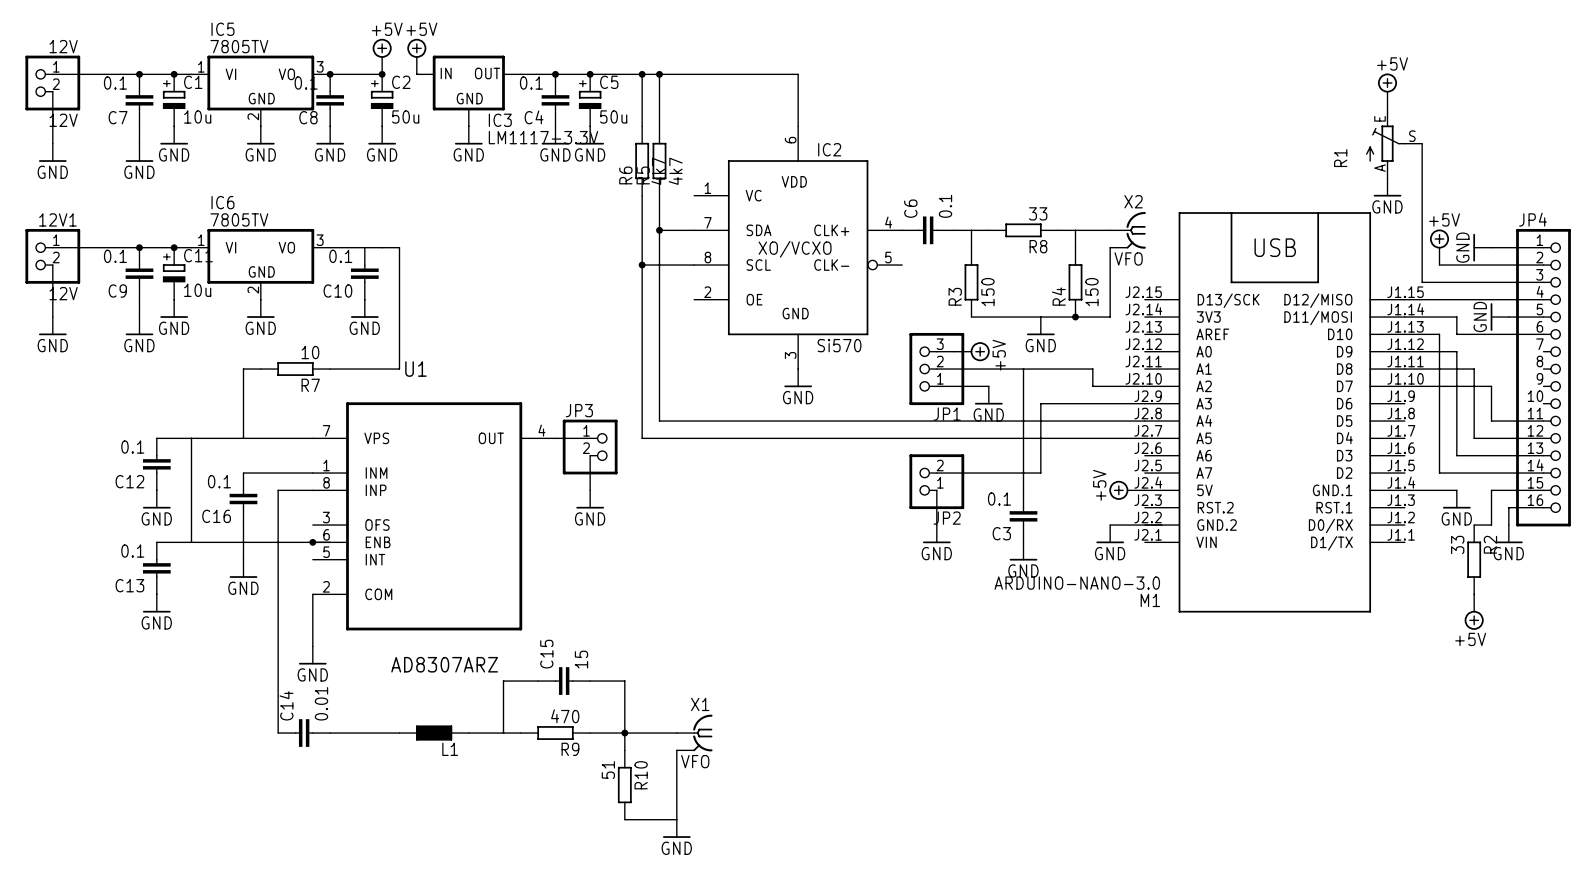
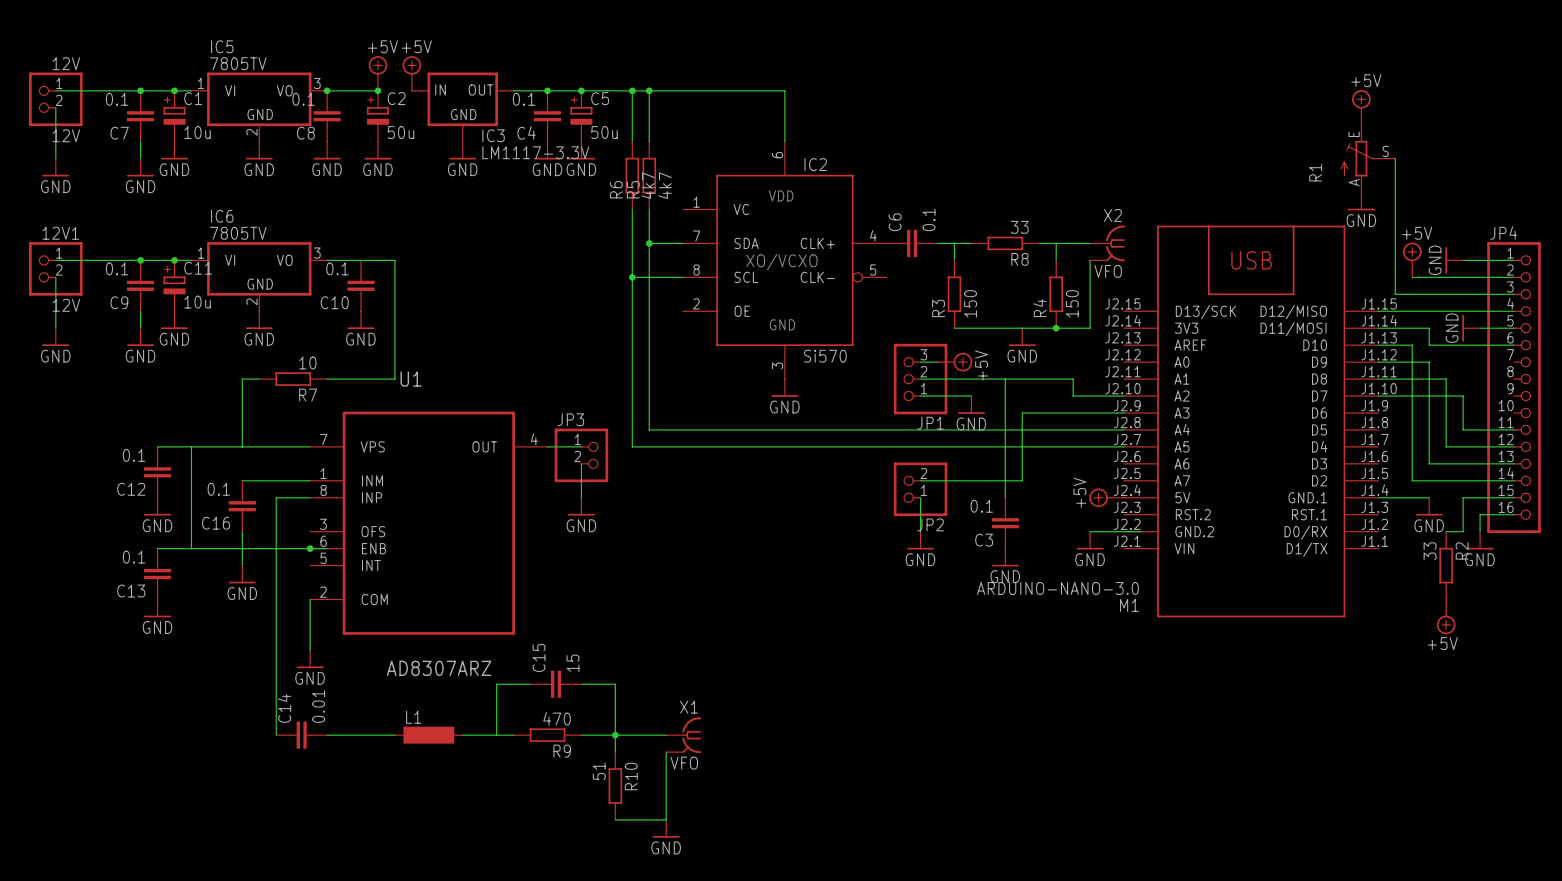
L1 symbol: [399, 725, 469, 741] -> [394, 726, 463, 744]
L1 name position: L1 (450, 749) -> L1 (413, 717)

